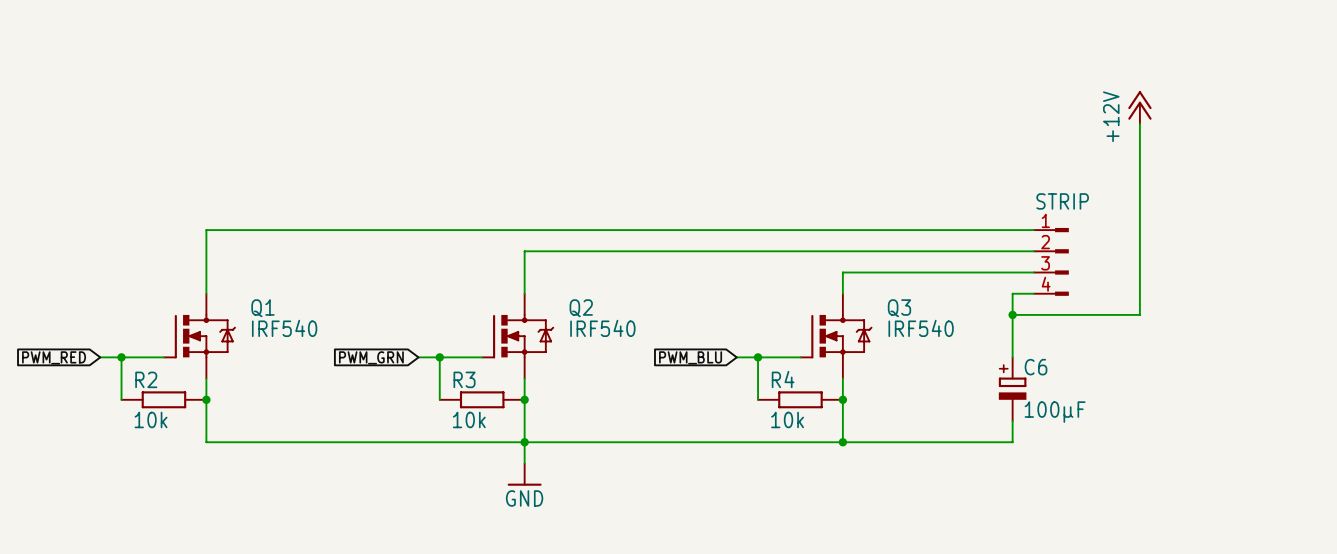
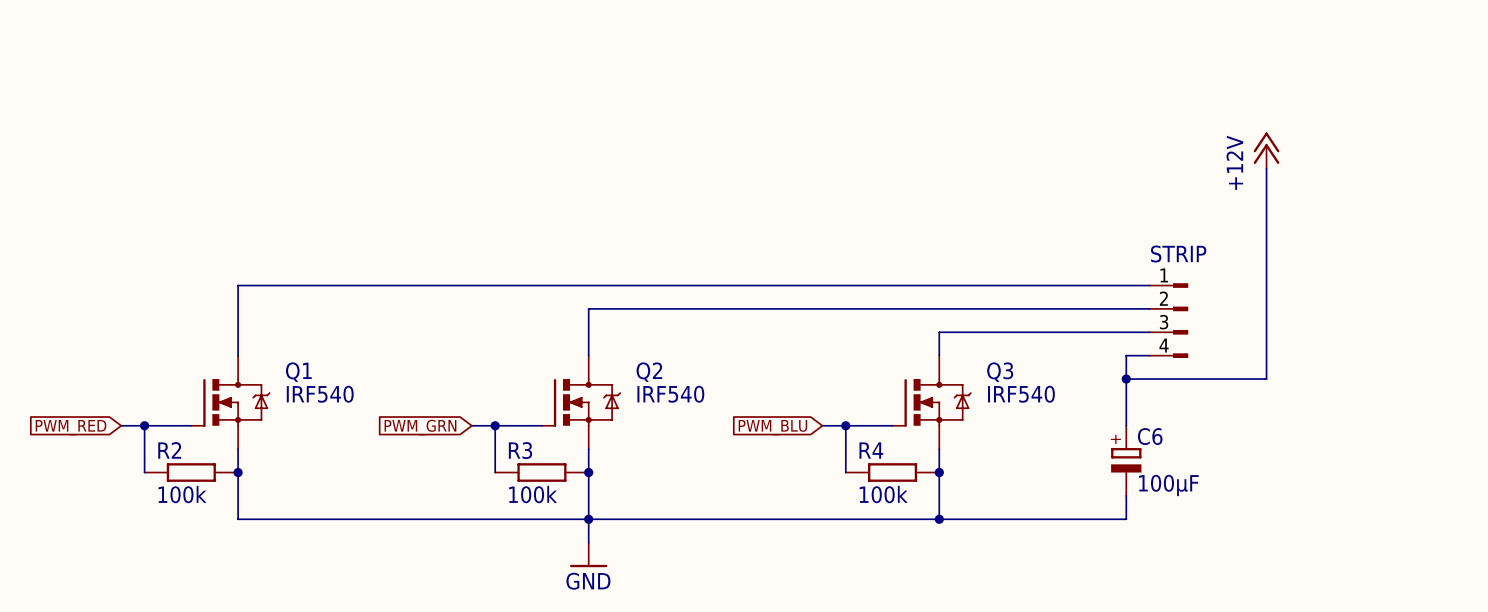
R2 value: 10k (151, 419) -> 100k (182, 494)
R3 value: 10k (469, 419) -> 100k (533, 494)
R4 value: 10k (787, 419) -> 100k (883, 494)

